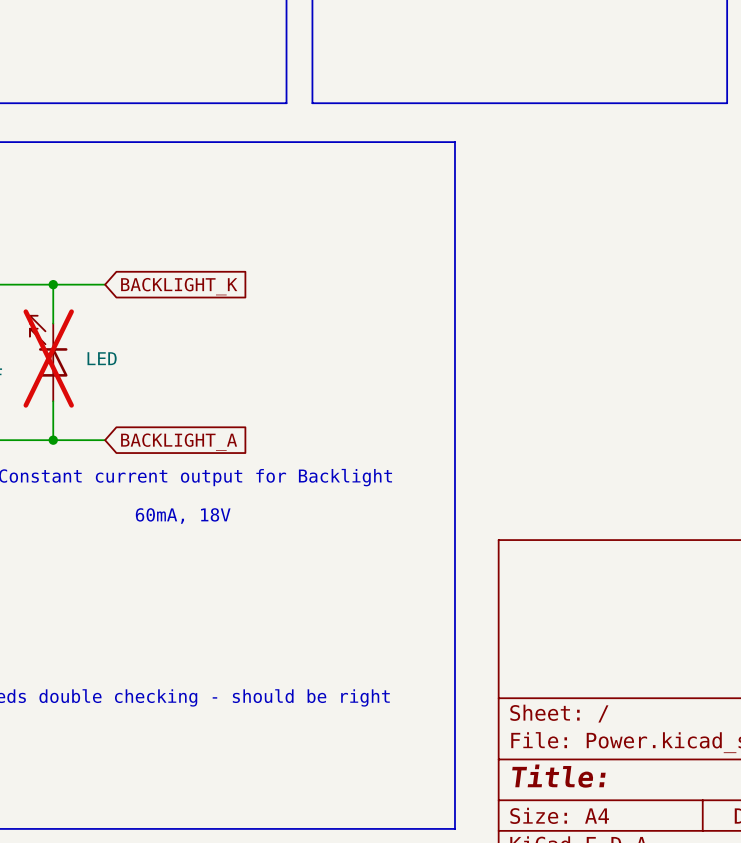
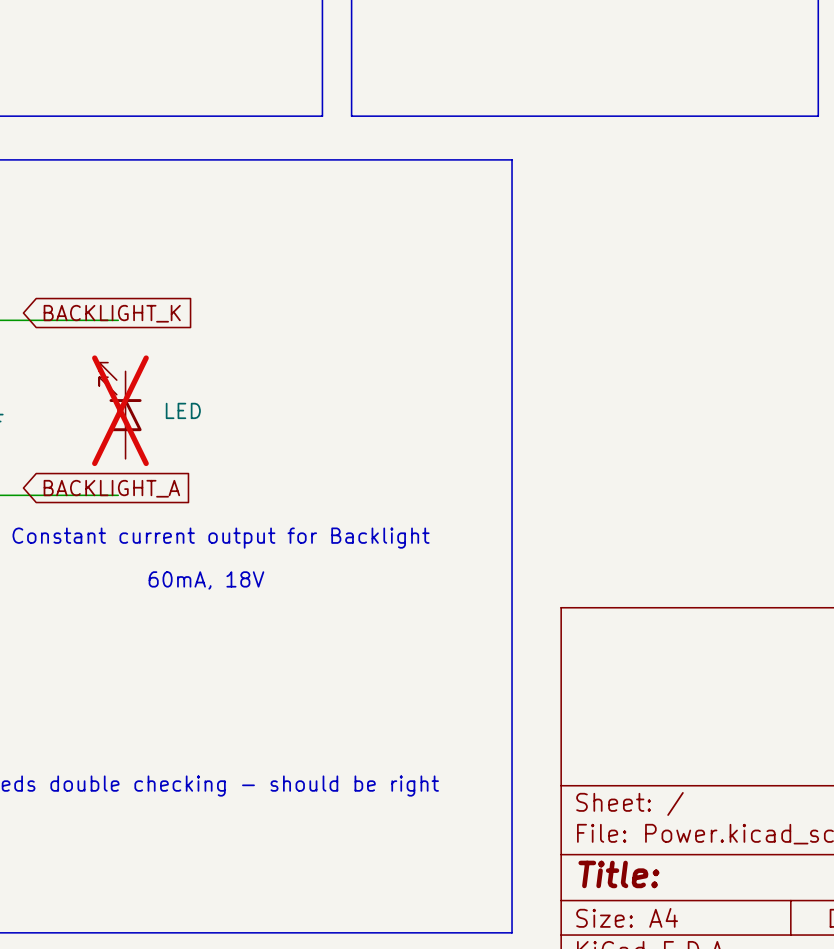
wire: (53, 284) (53, 323) -> none
junction: (53, 284) -> none
global label position: BACKLIGHT_K (179, 286) -> BACKLIGHT_K (112, 313)
part position: (48, 358) -> (120, 410)
wire: (53, 401) (53, 440) -> none
junction: (53, 440) -> none
global label position: BACKLIGHT_A (179, 442) -> BACKLIGHT_A (111, 488)

